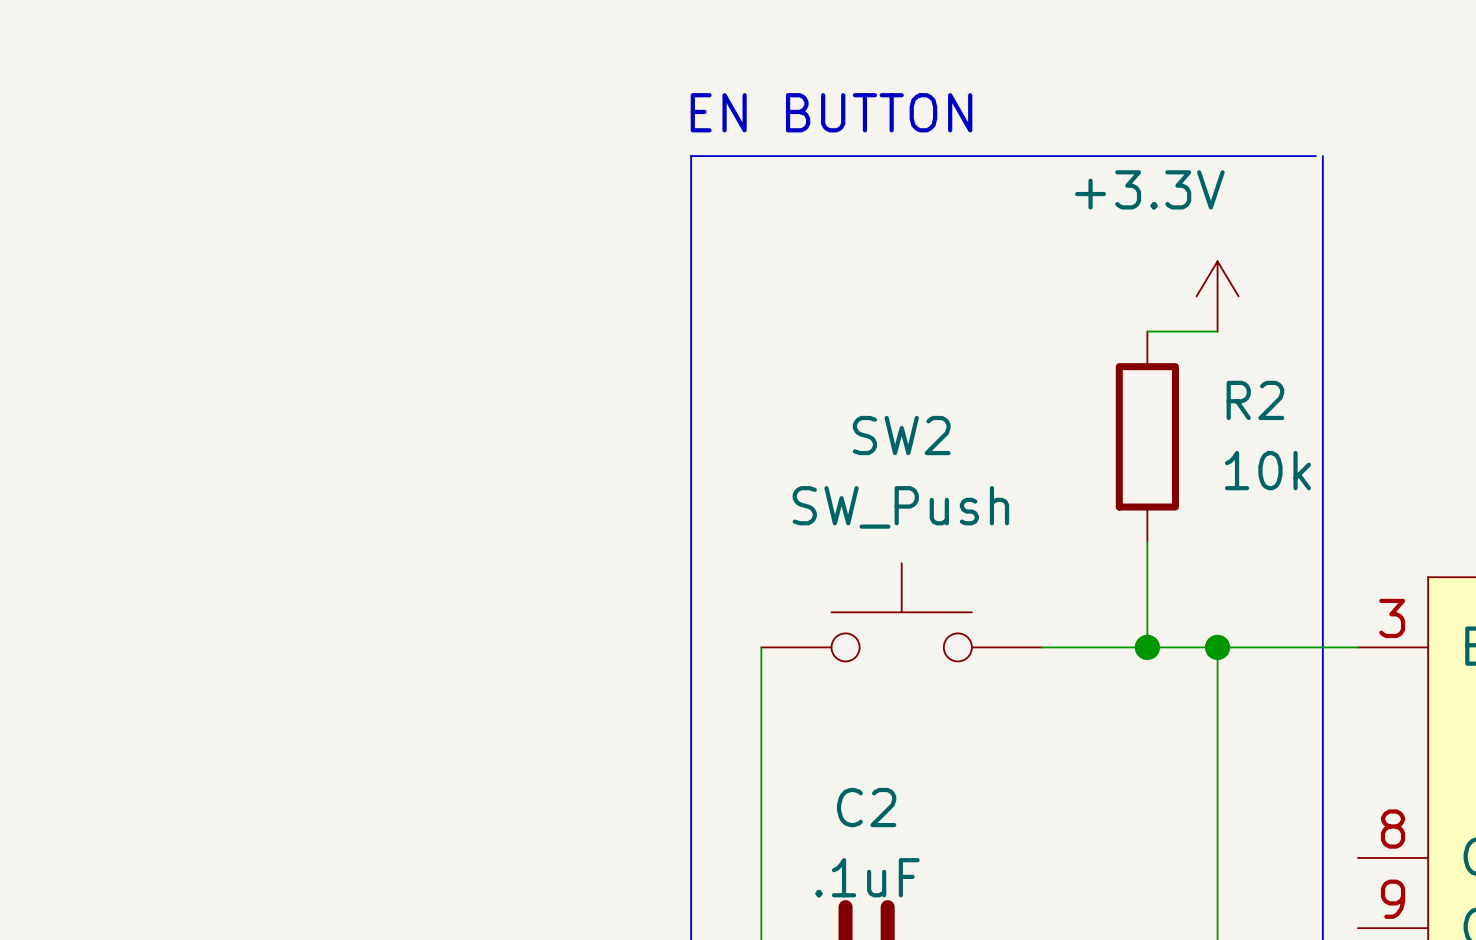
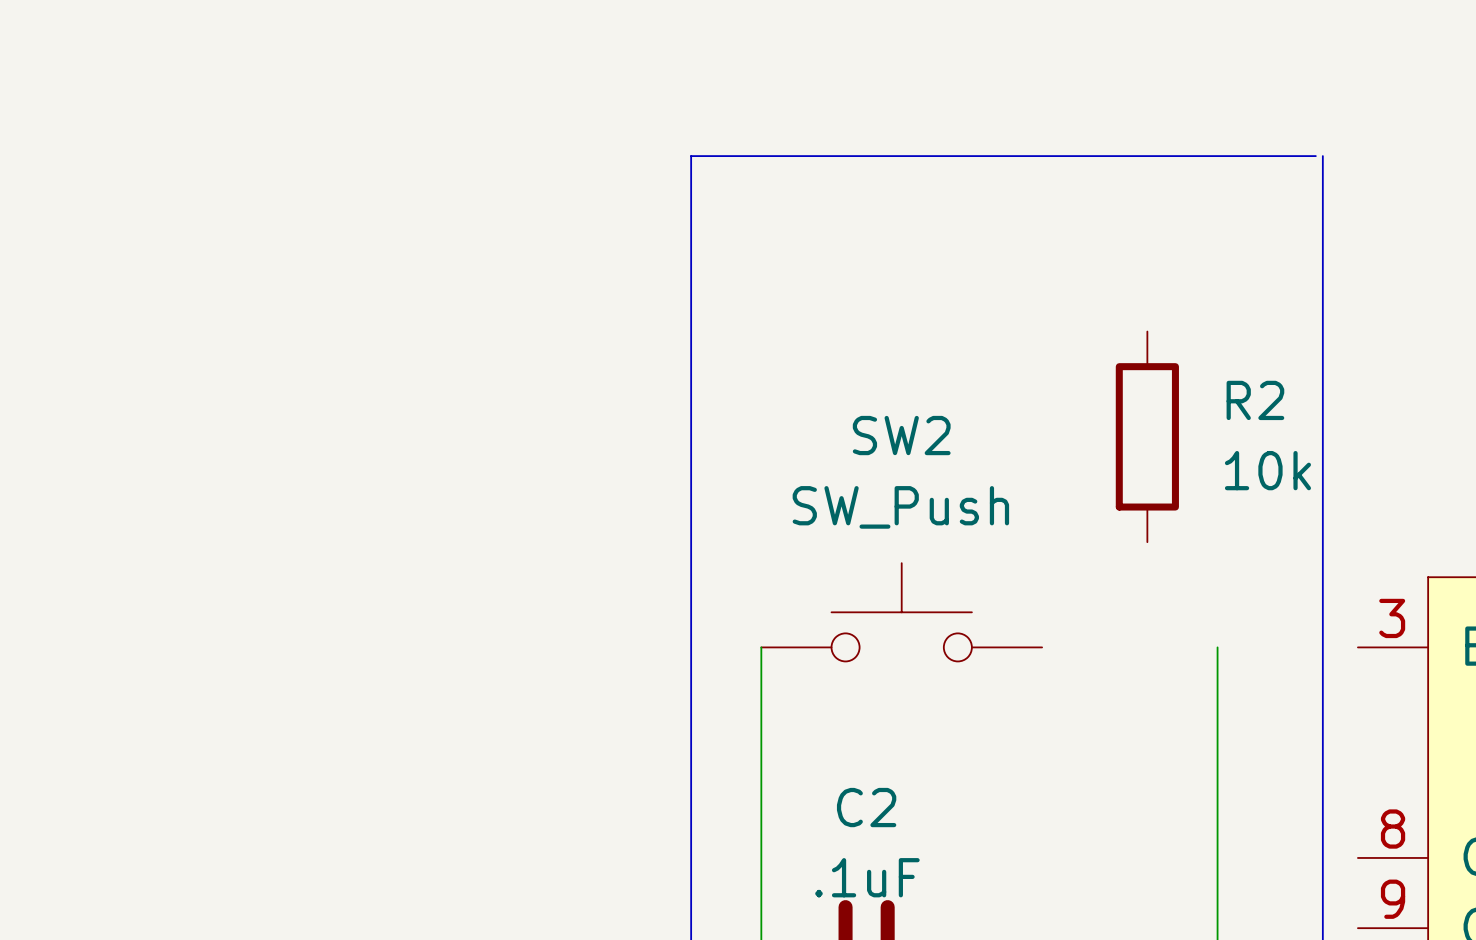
text: EN BUTTON (831, 112) -> none
power symbol: +3.3V (1217, 296) -> none
wire: (1147, 331) (1217, 331) -> none
wire: (1147, 542) (1147, 647) -> none
wire: (1042, 647) (1357, 647) -> none
junction: (1147, 647) -> none
junction: (1217, 647) -> none

